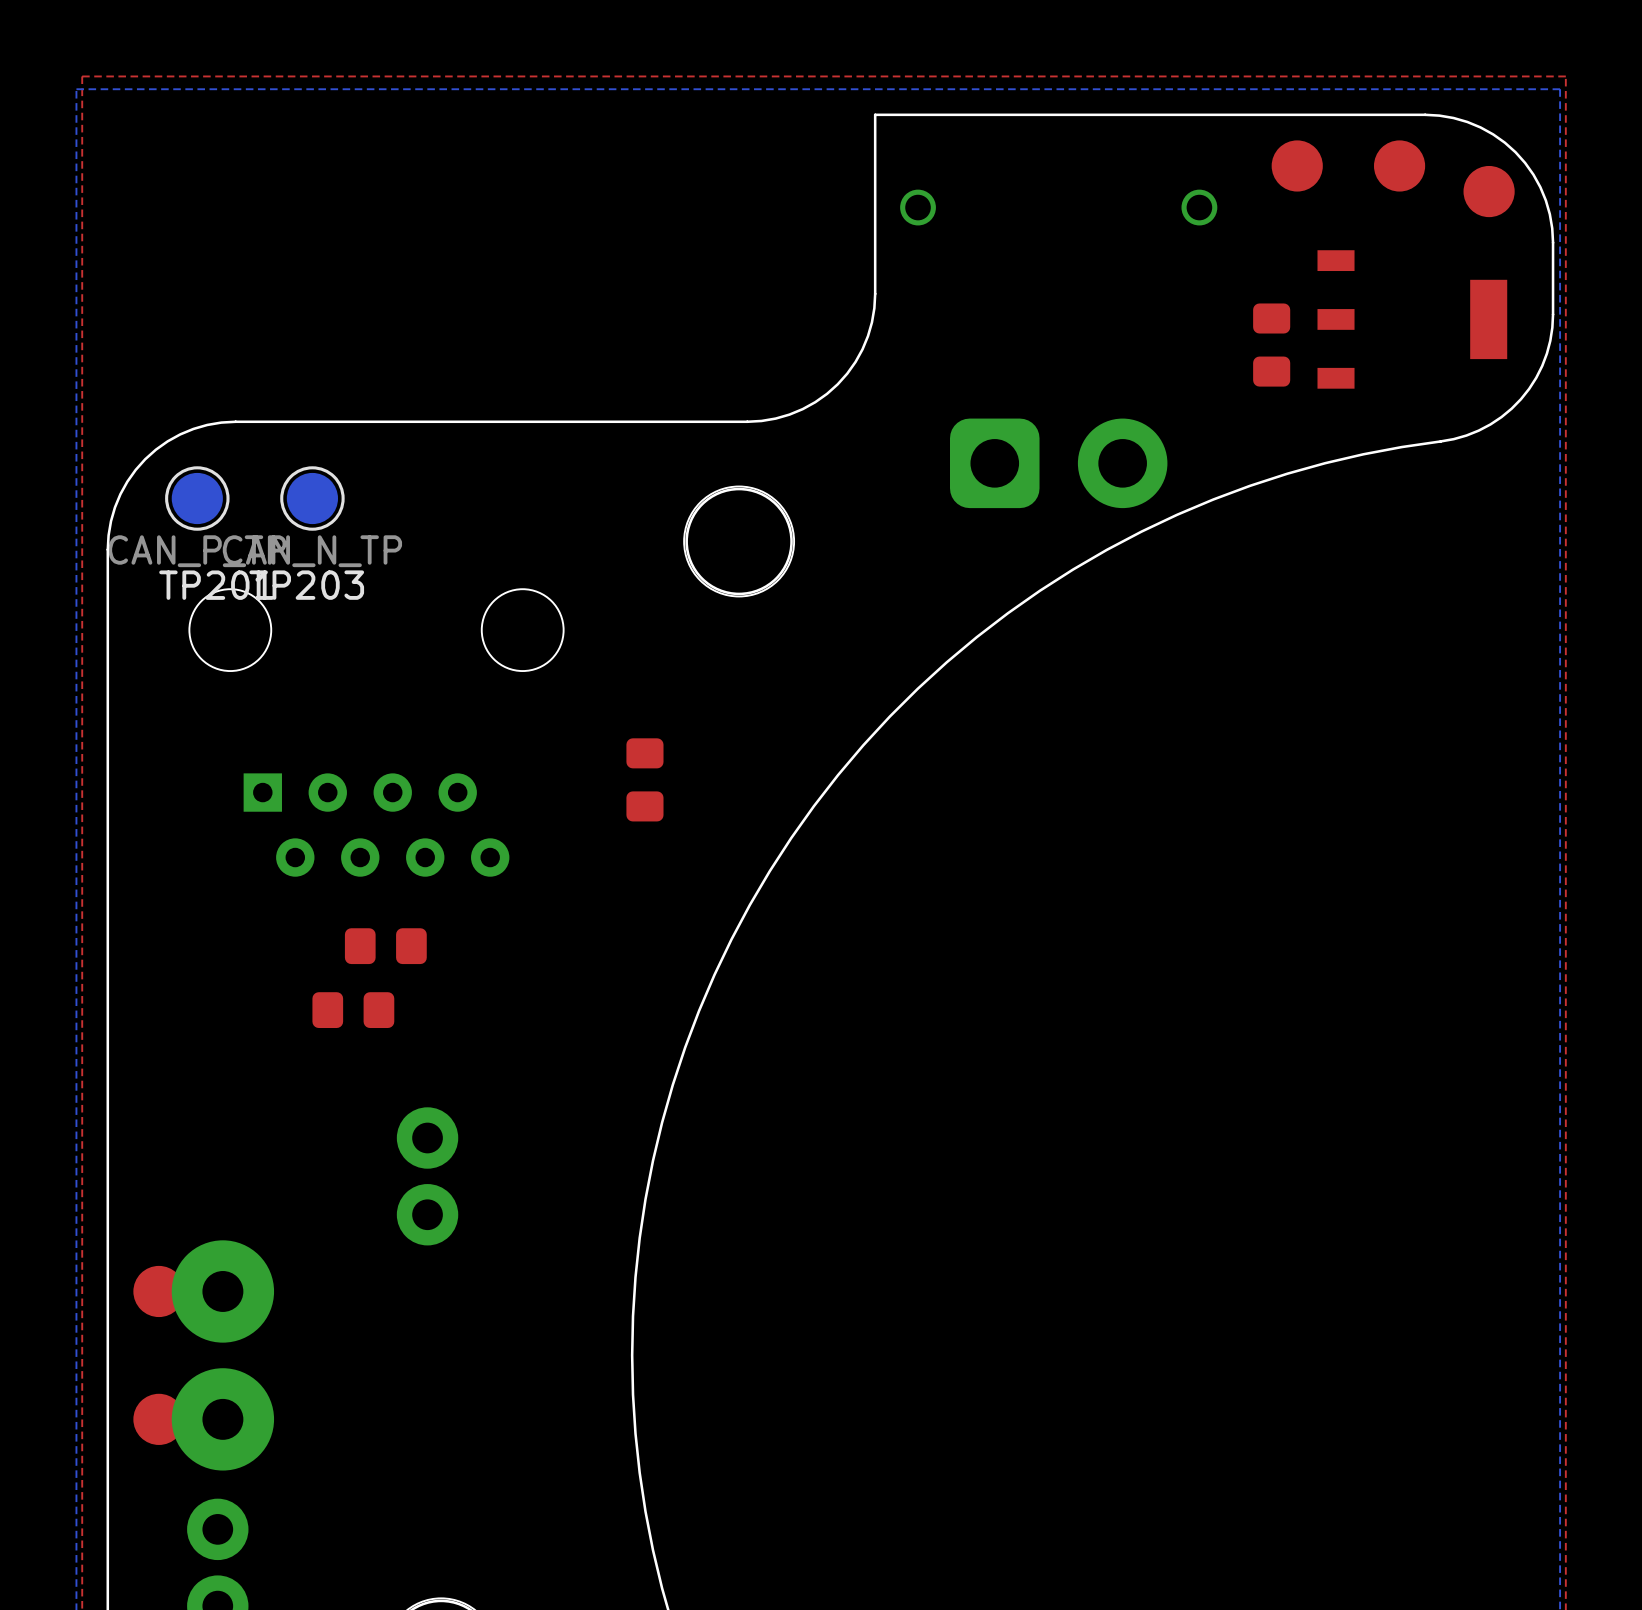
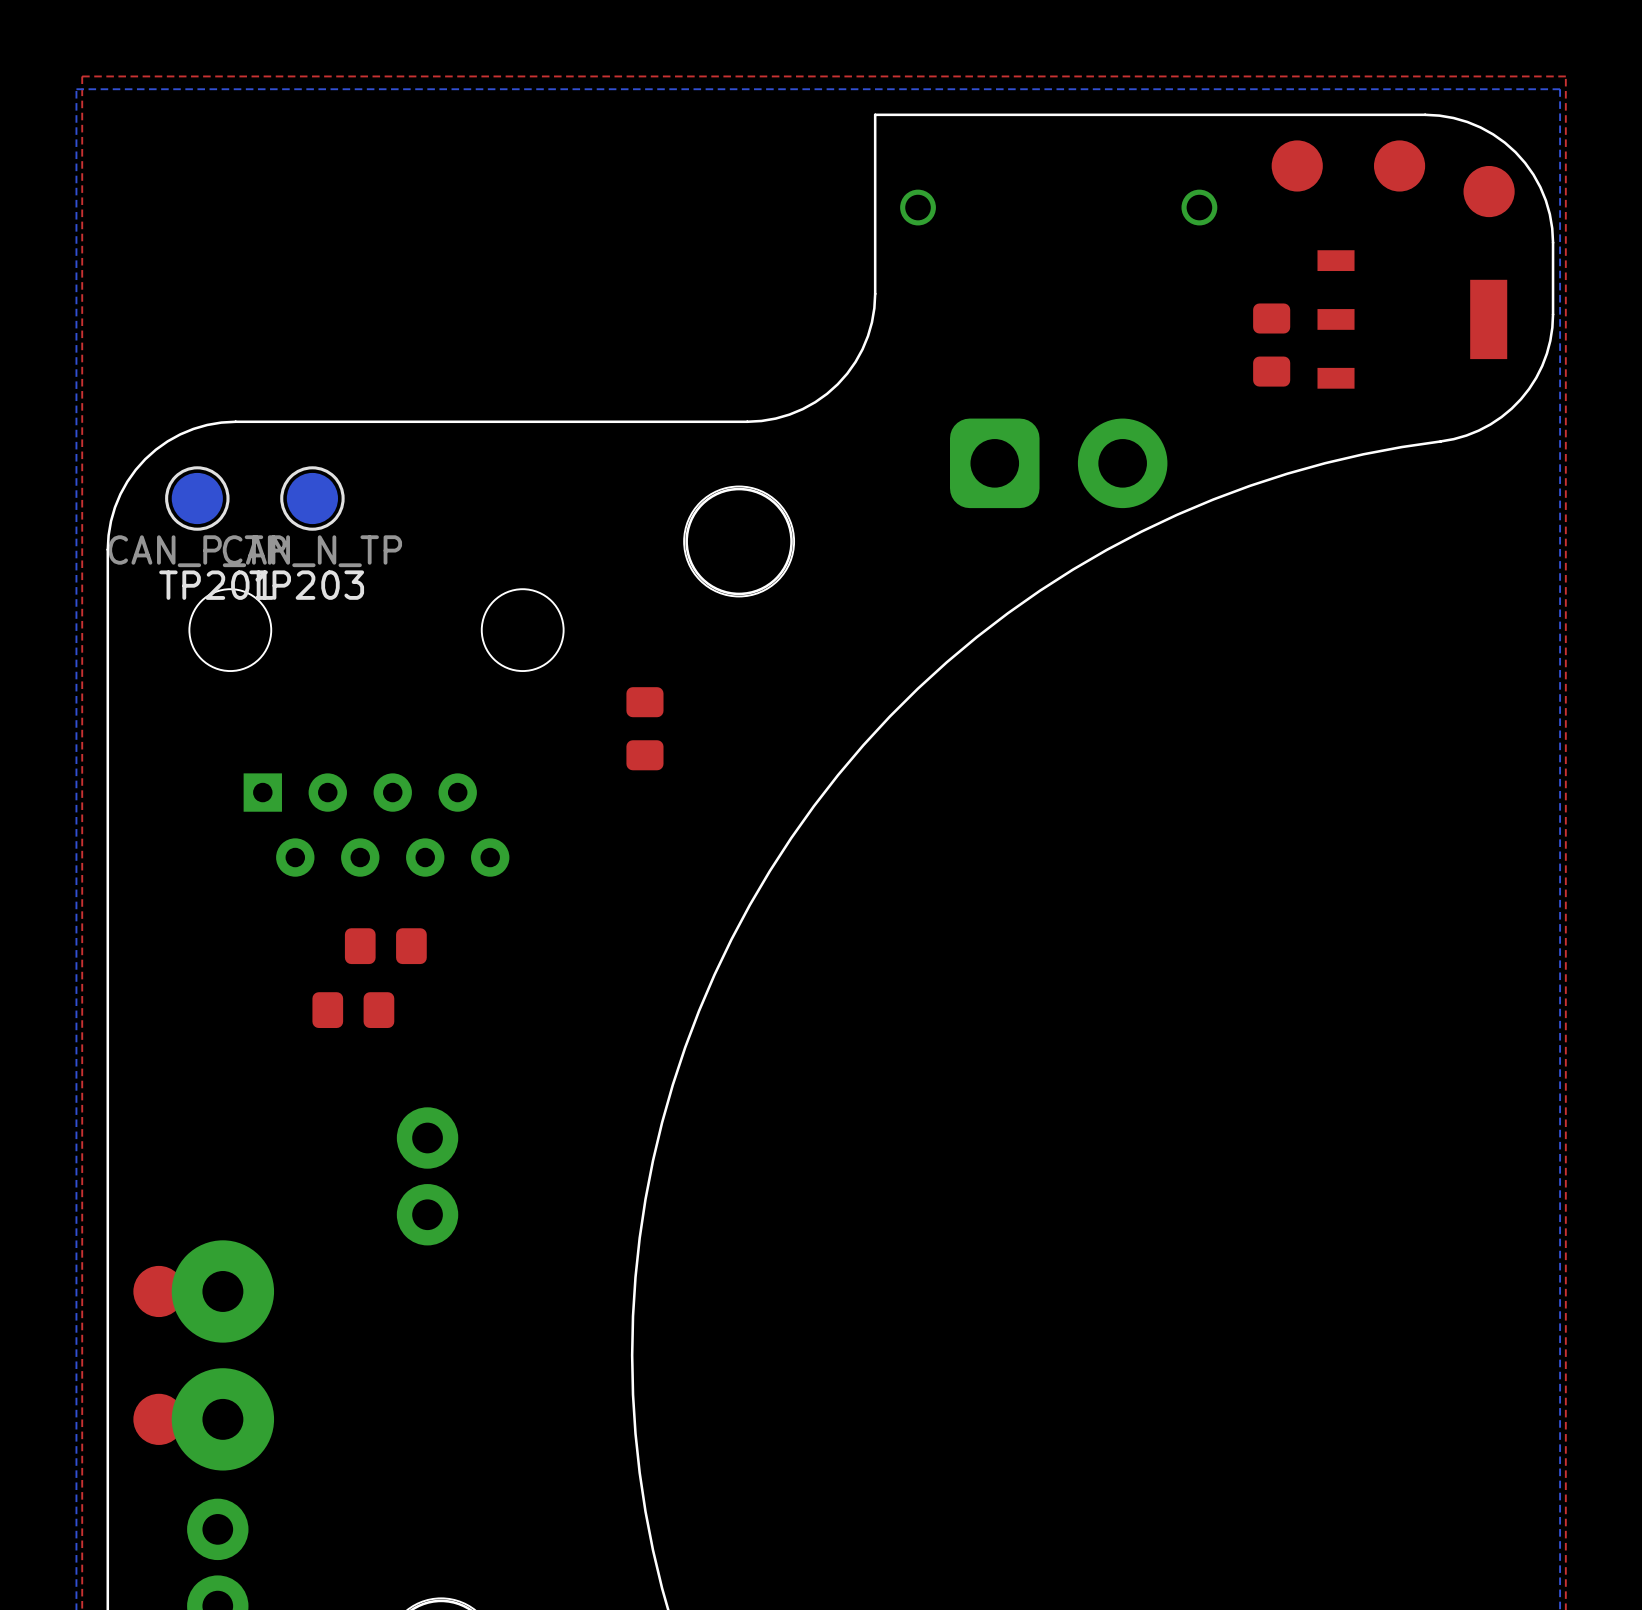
part position: (644, 779) -> (644, 728)

